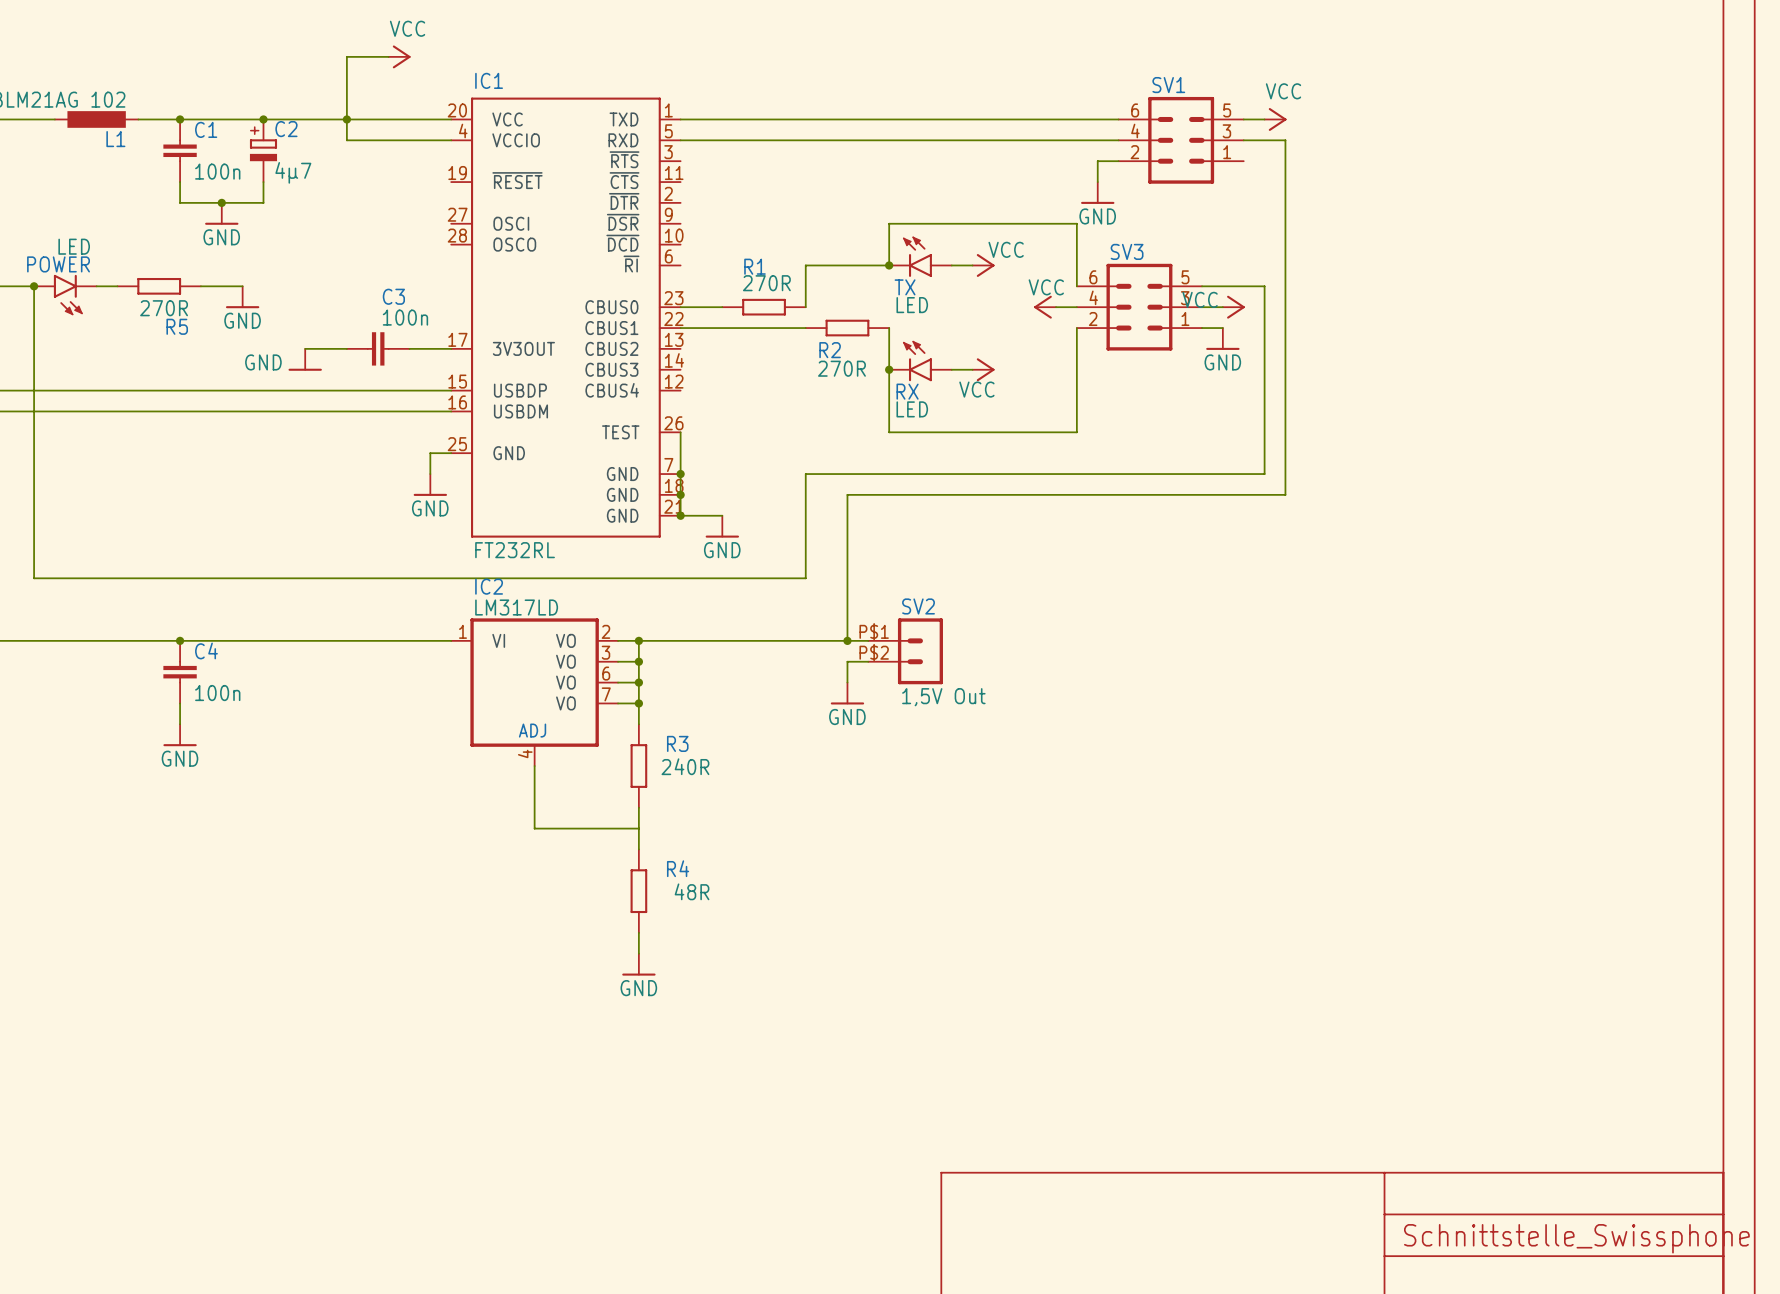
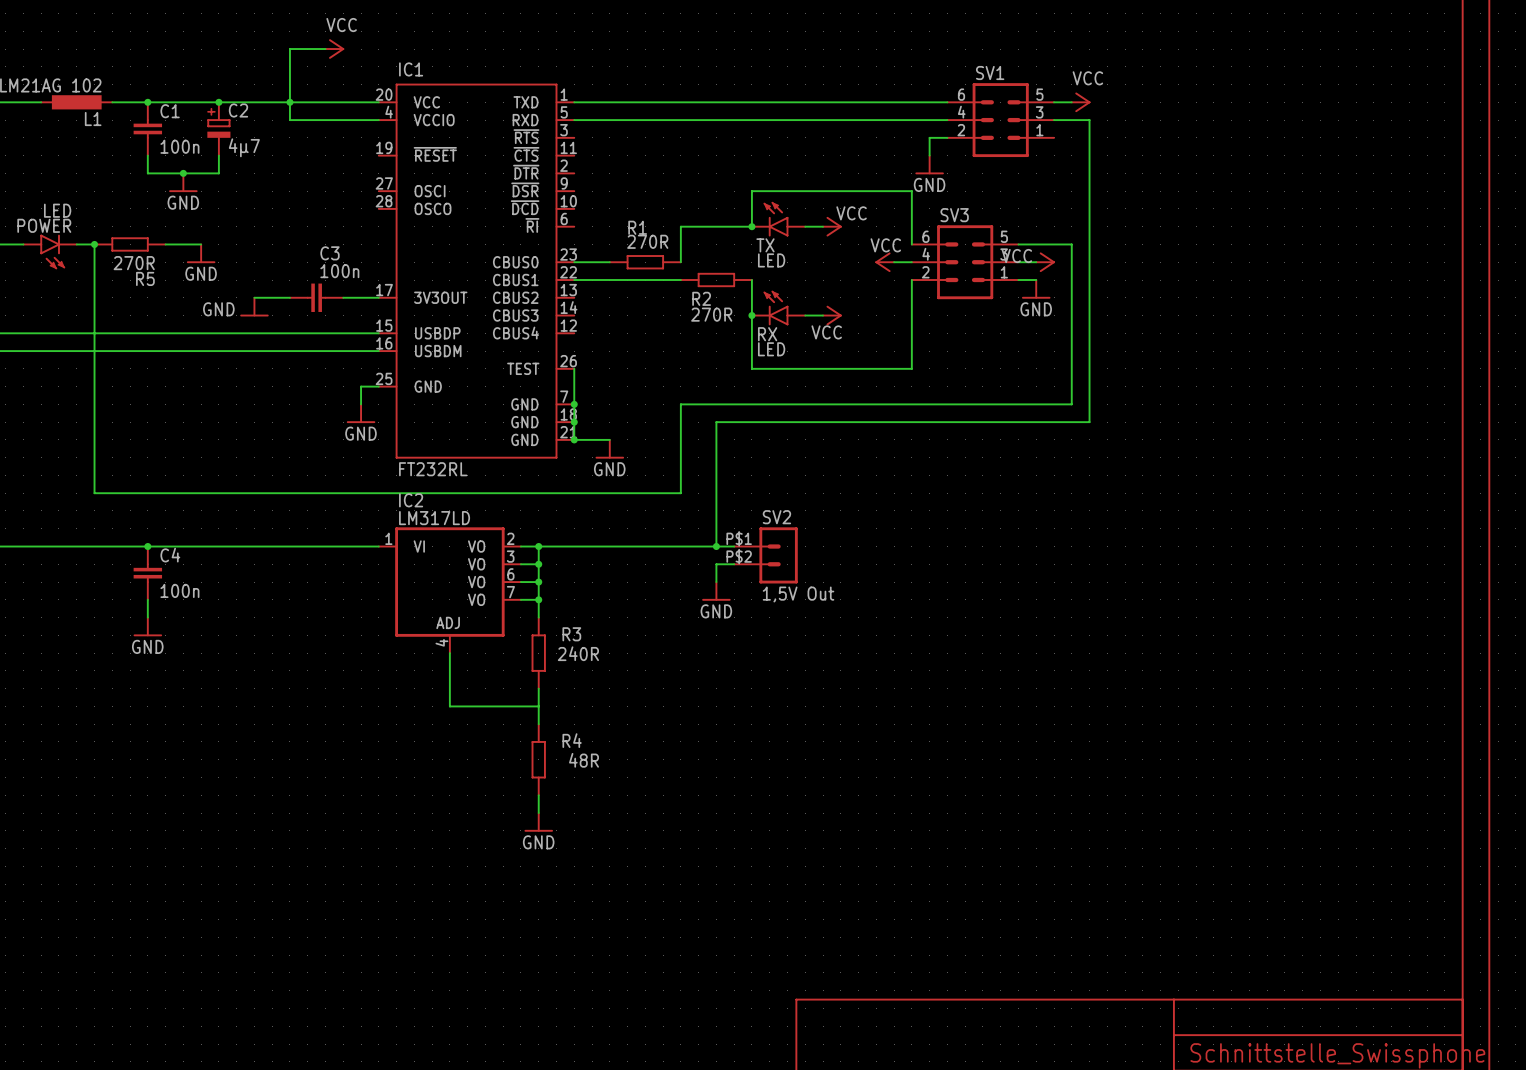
wire: (34, 286) (34, 578) (117, 578) -> (94, 244) (94, 493)
junction: (34, 286) -> none
junction: none -> (94, 244)

